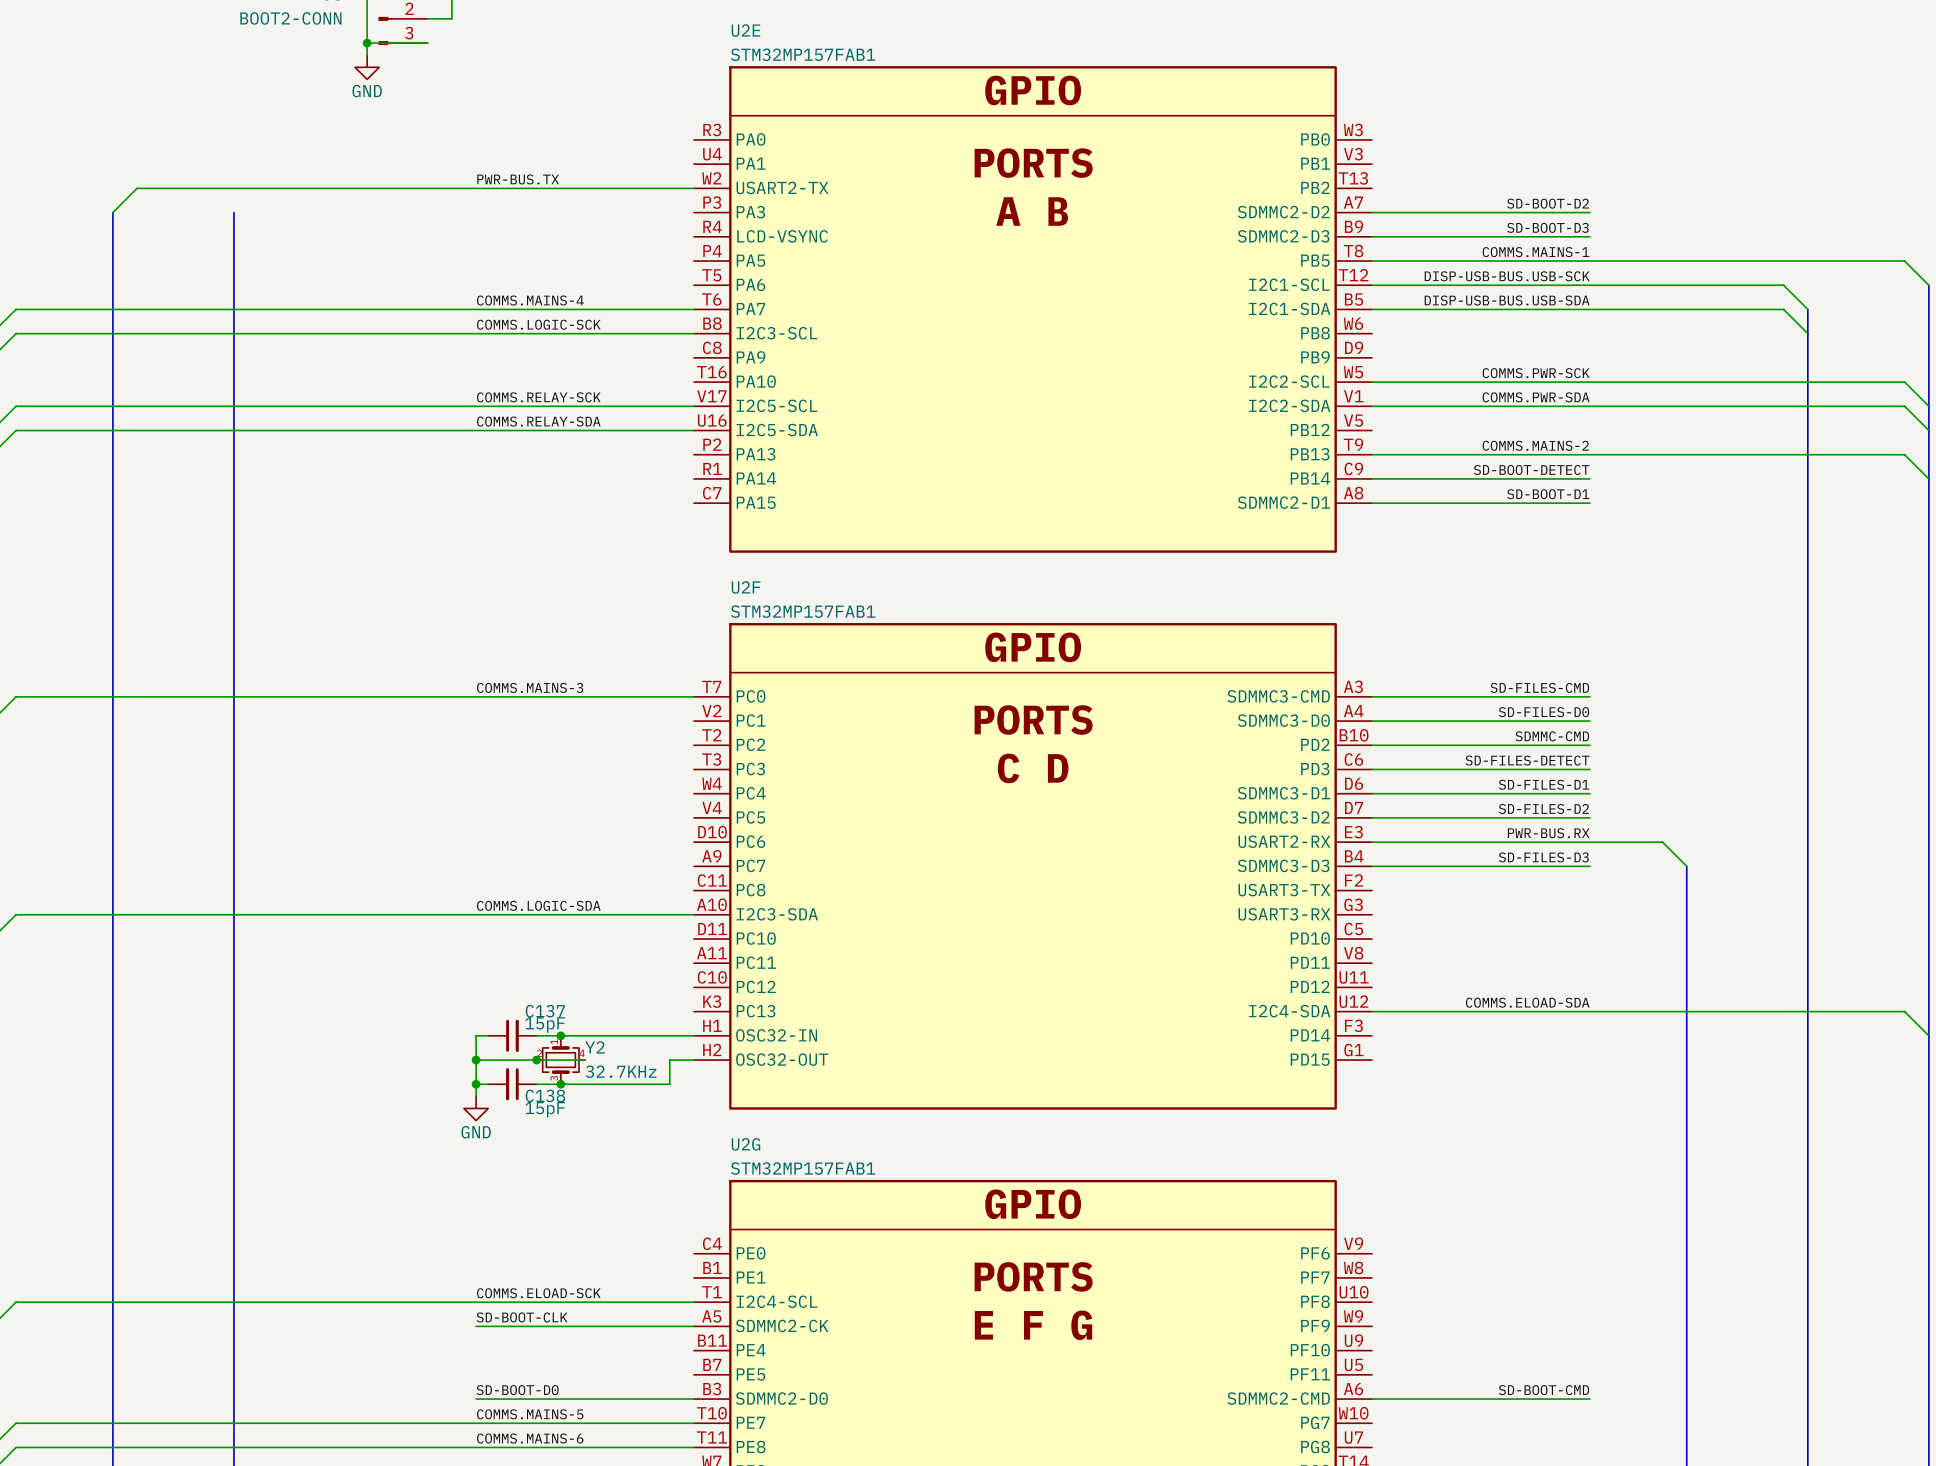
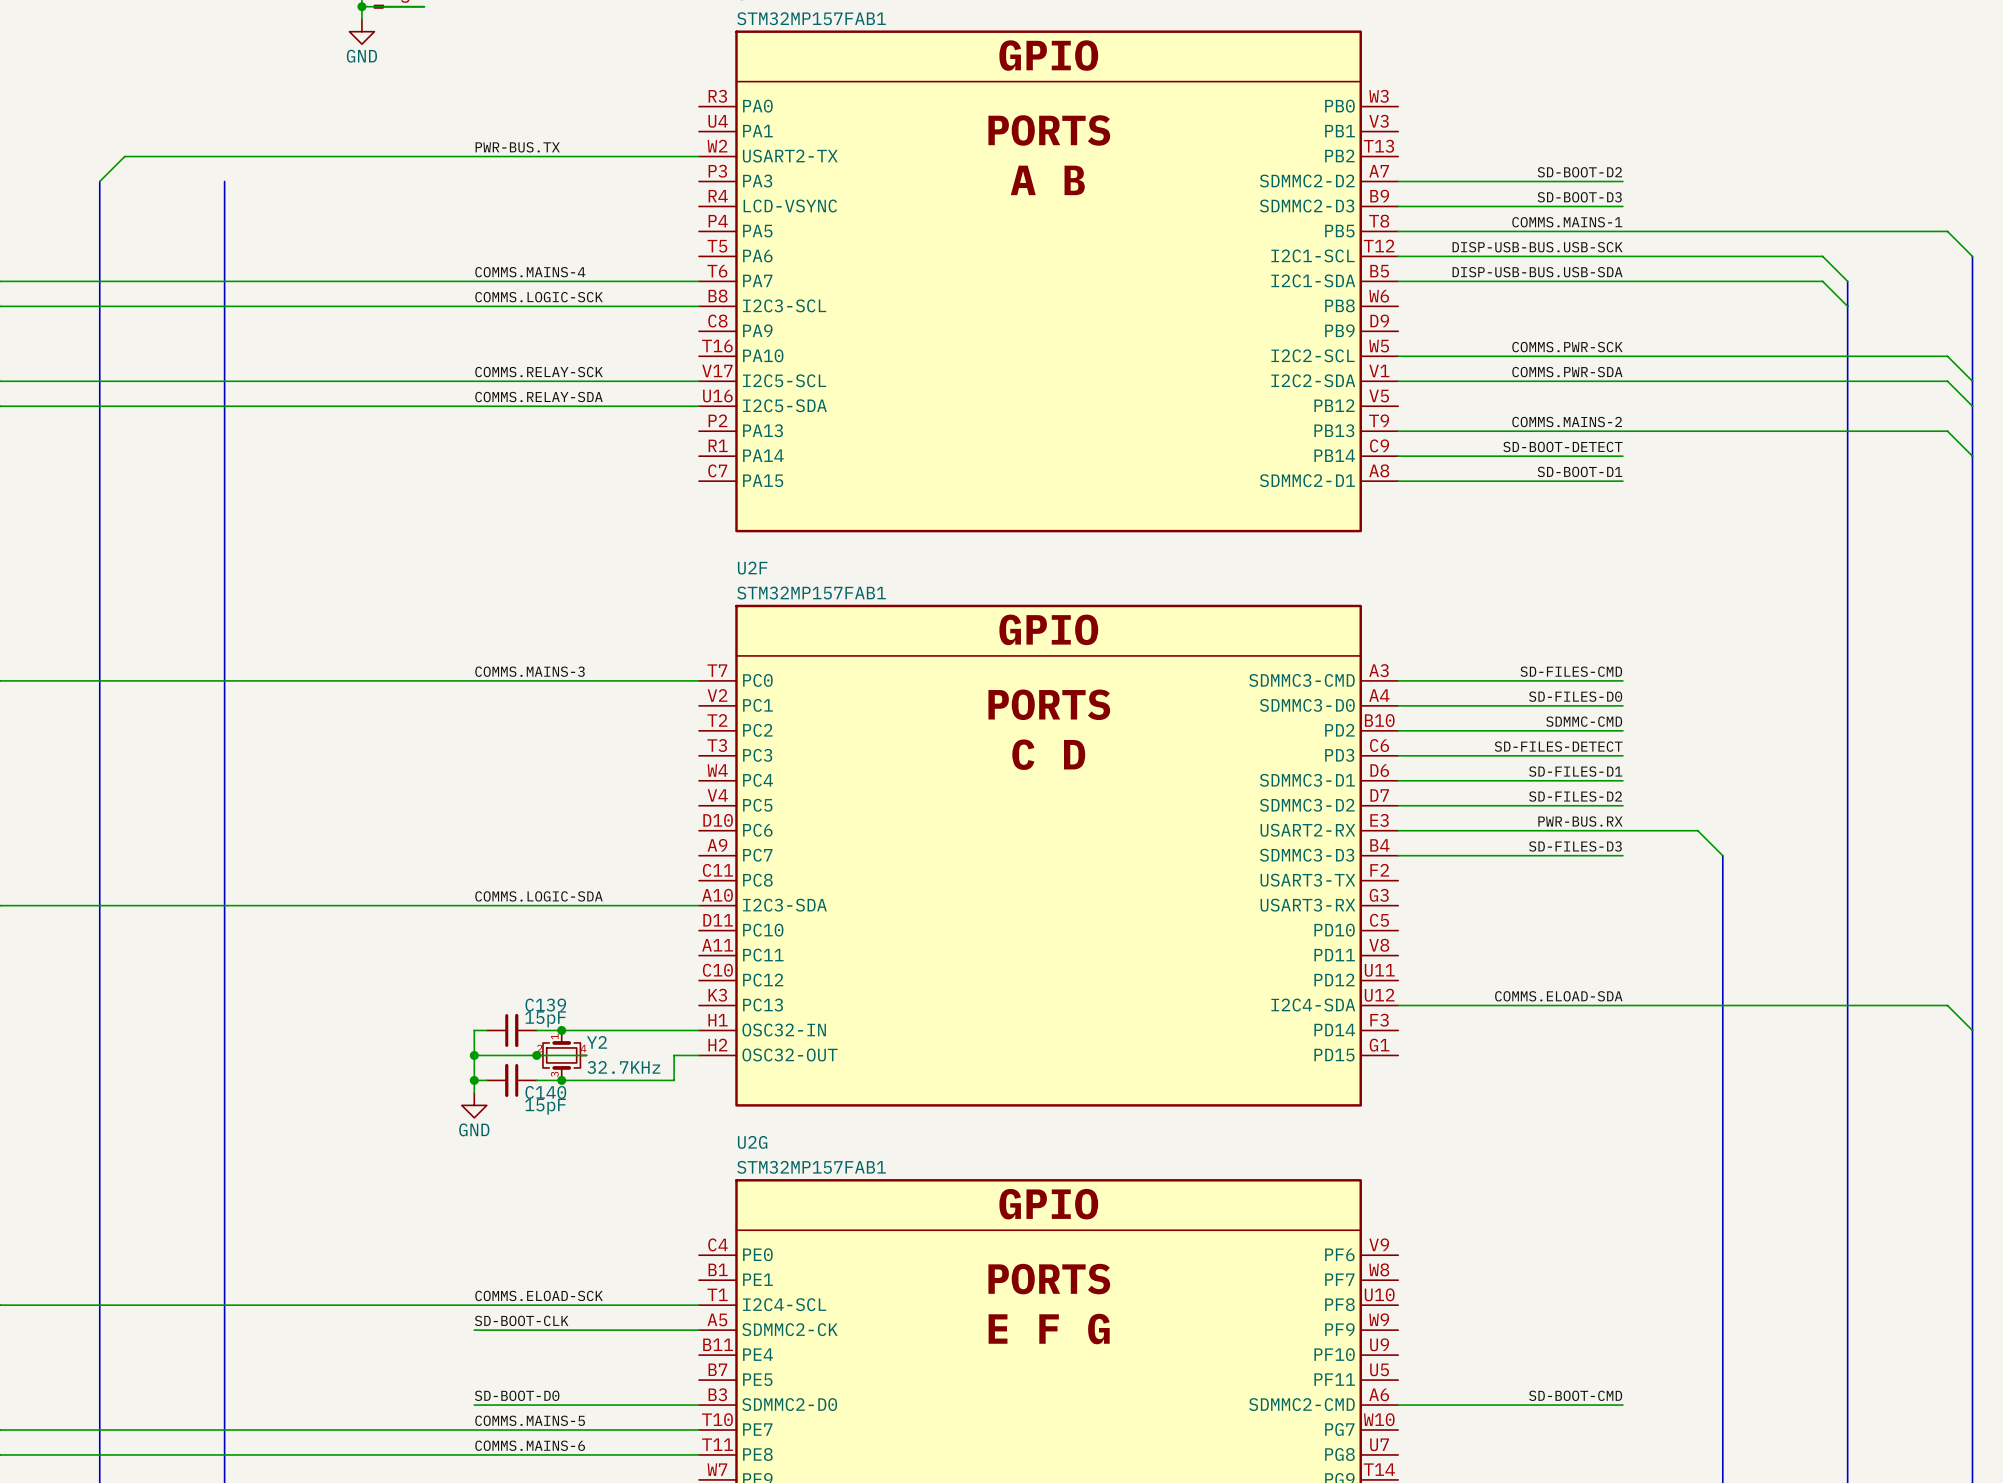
C137 name: C137 (545, 1011) -> C139 (545, 1005)
C138 name: C138 (545, 1095) -> C140 (545, 1092)

